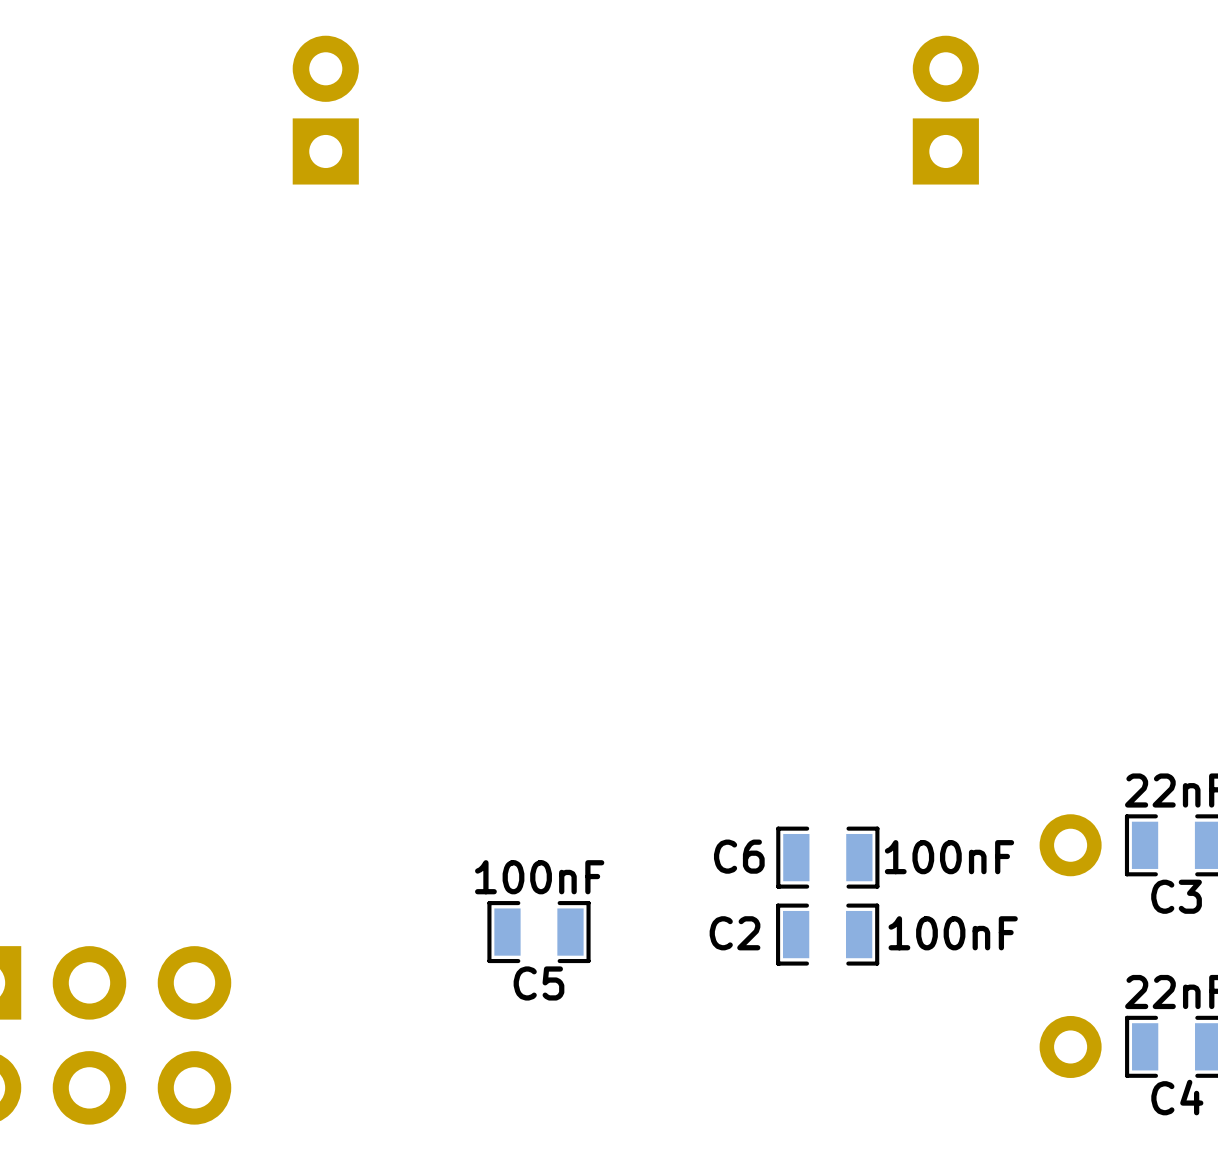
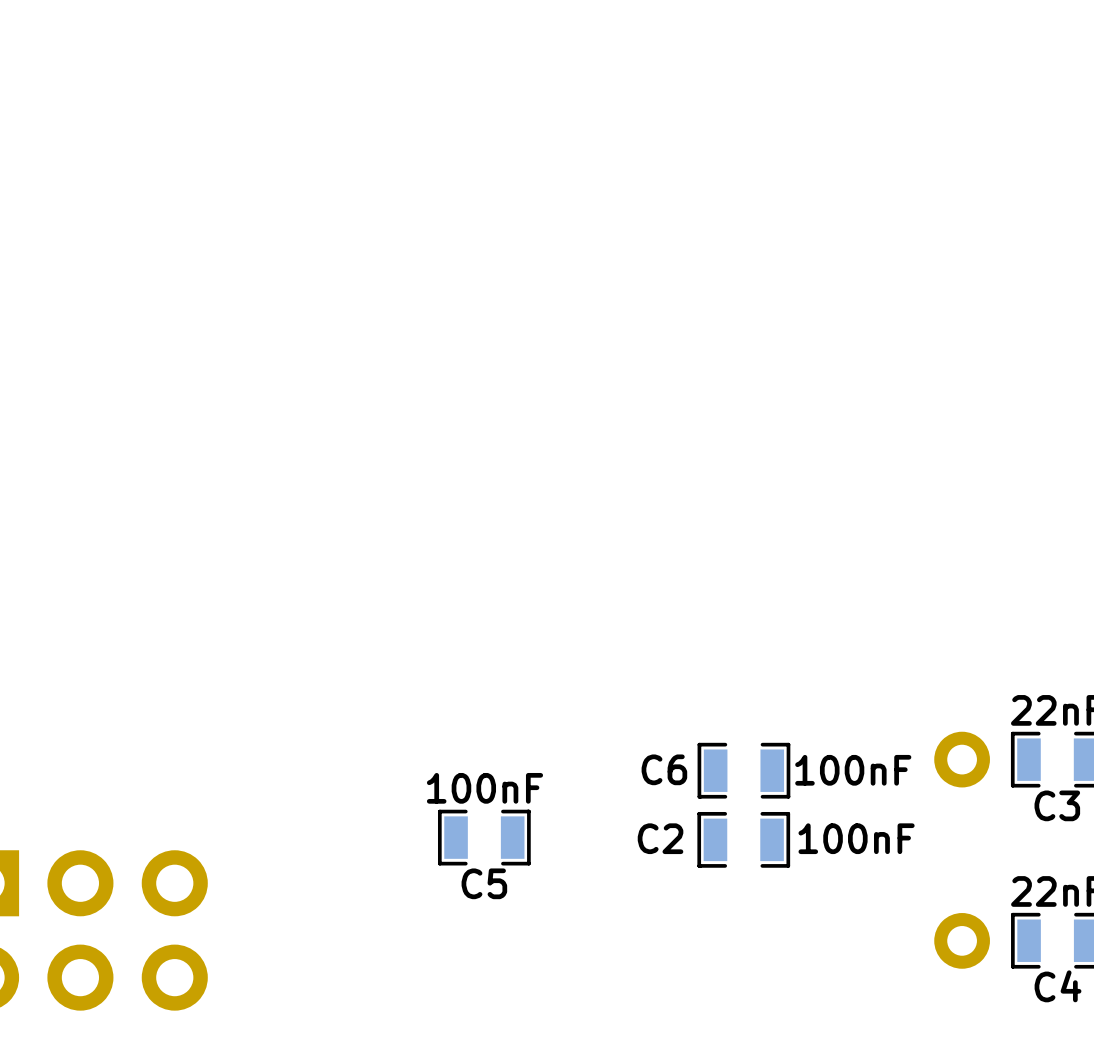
part: (325, 110) -> none
part: (945, 110) -> none

